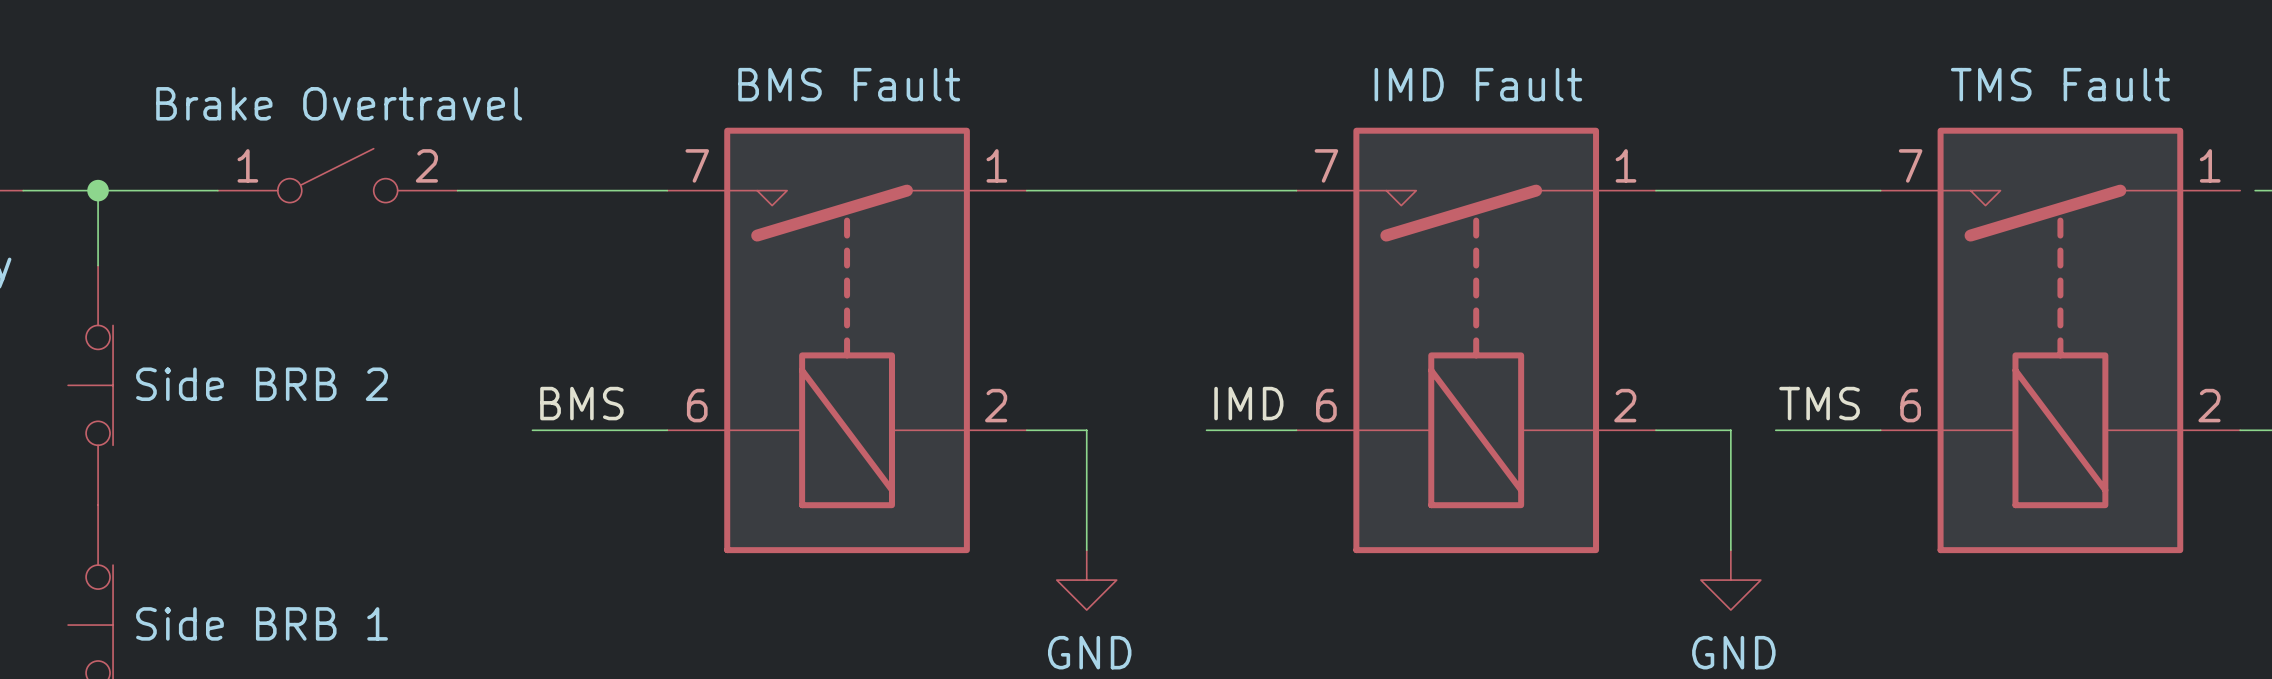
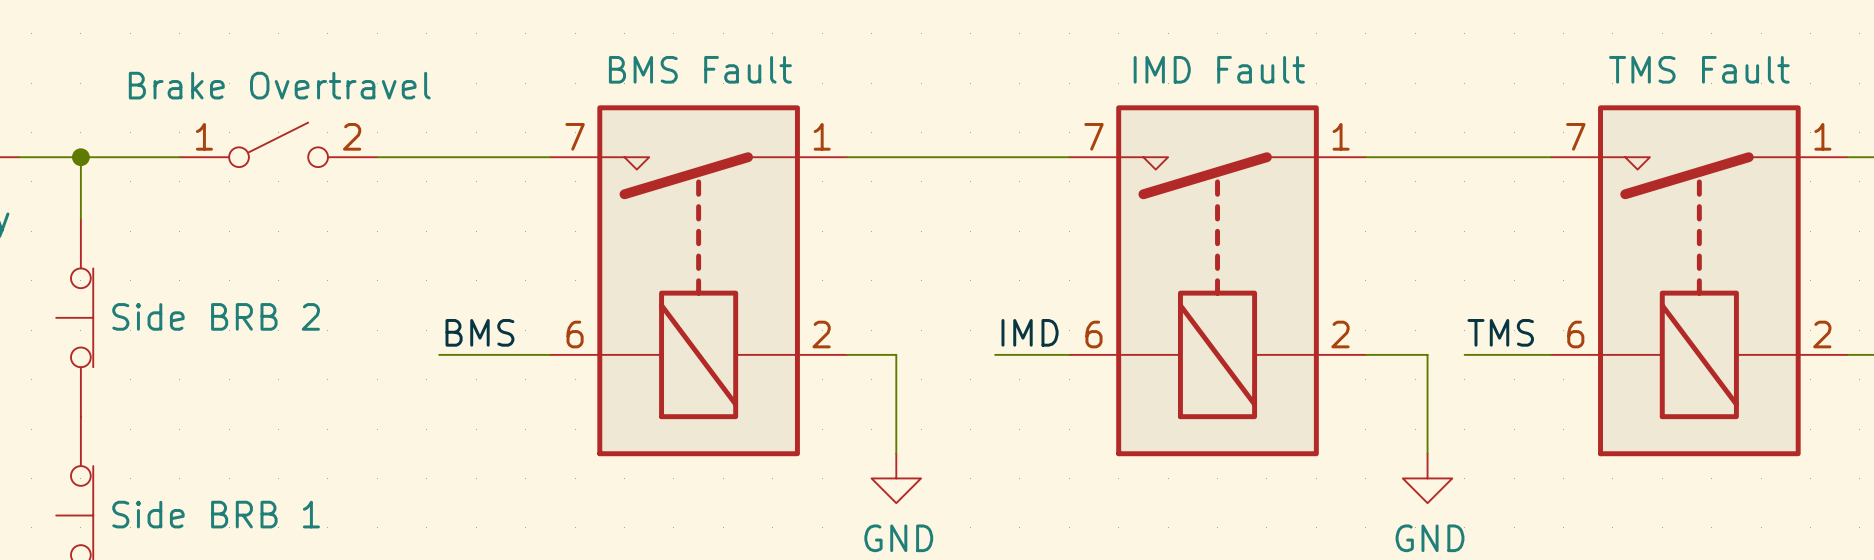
wire: none -> (1847, 157) (1859, 157)

